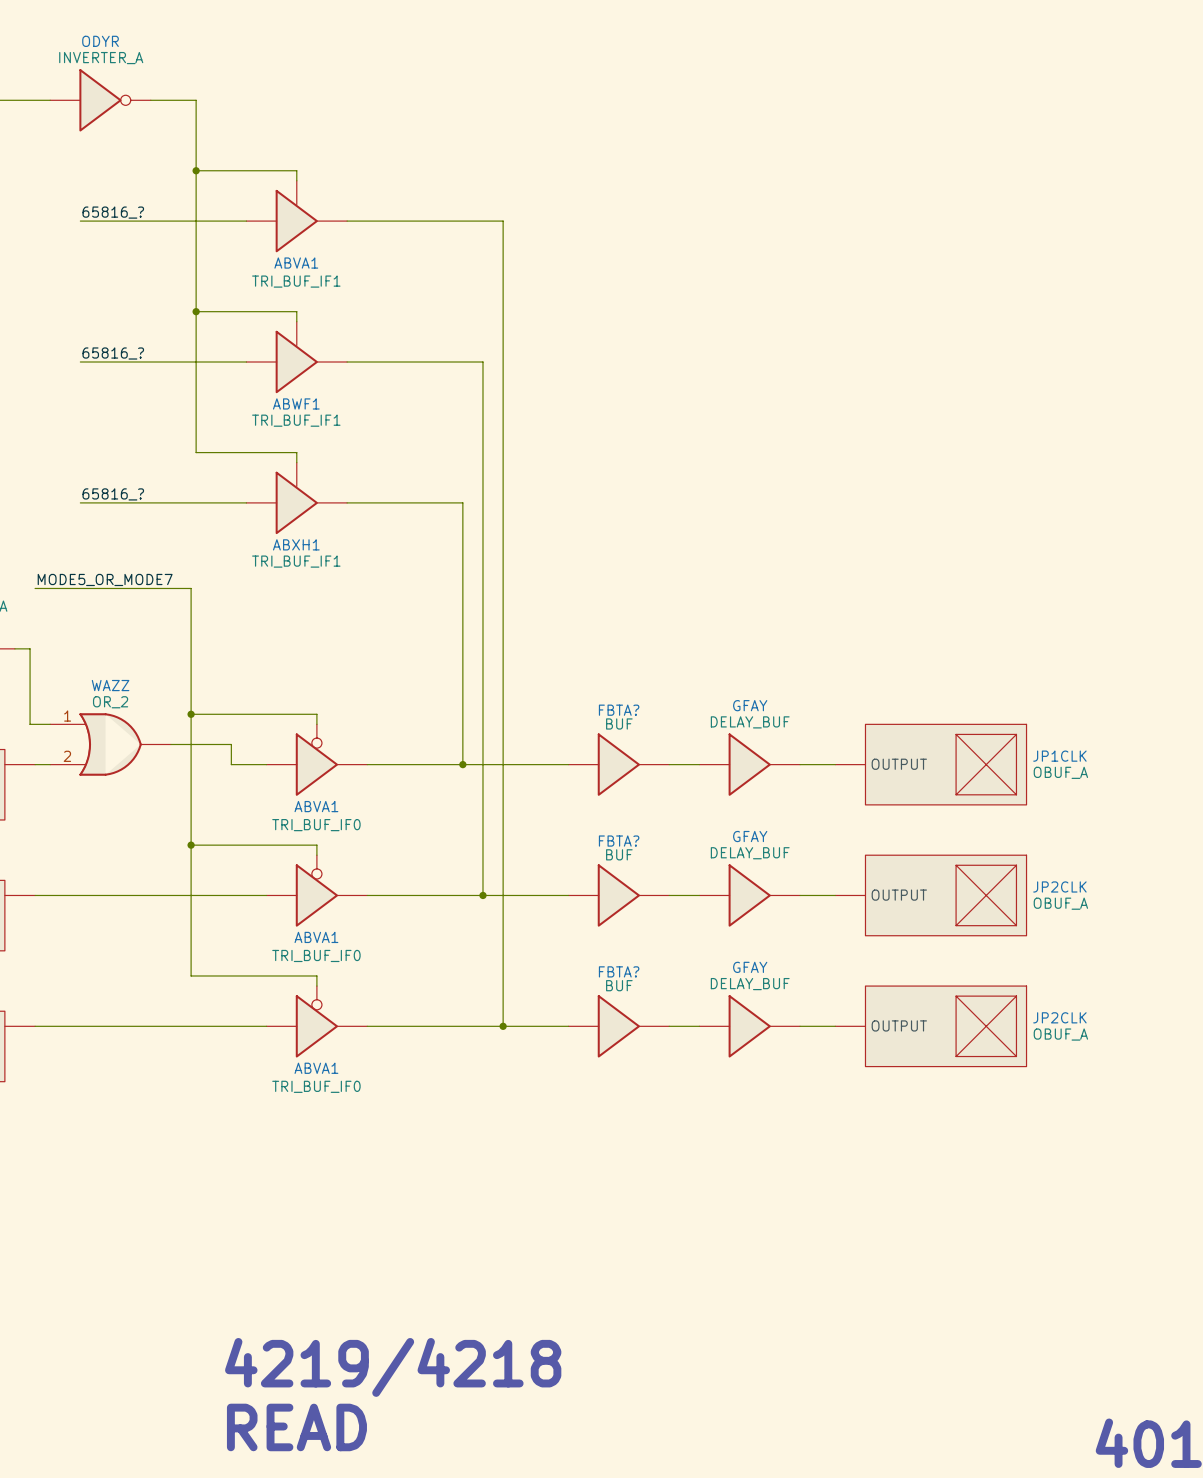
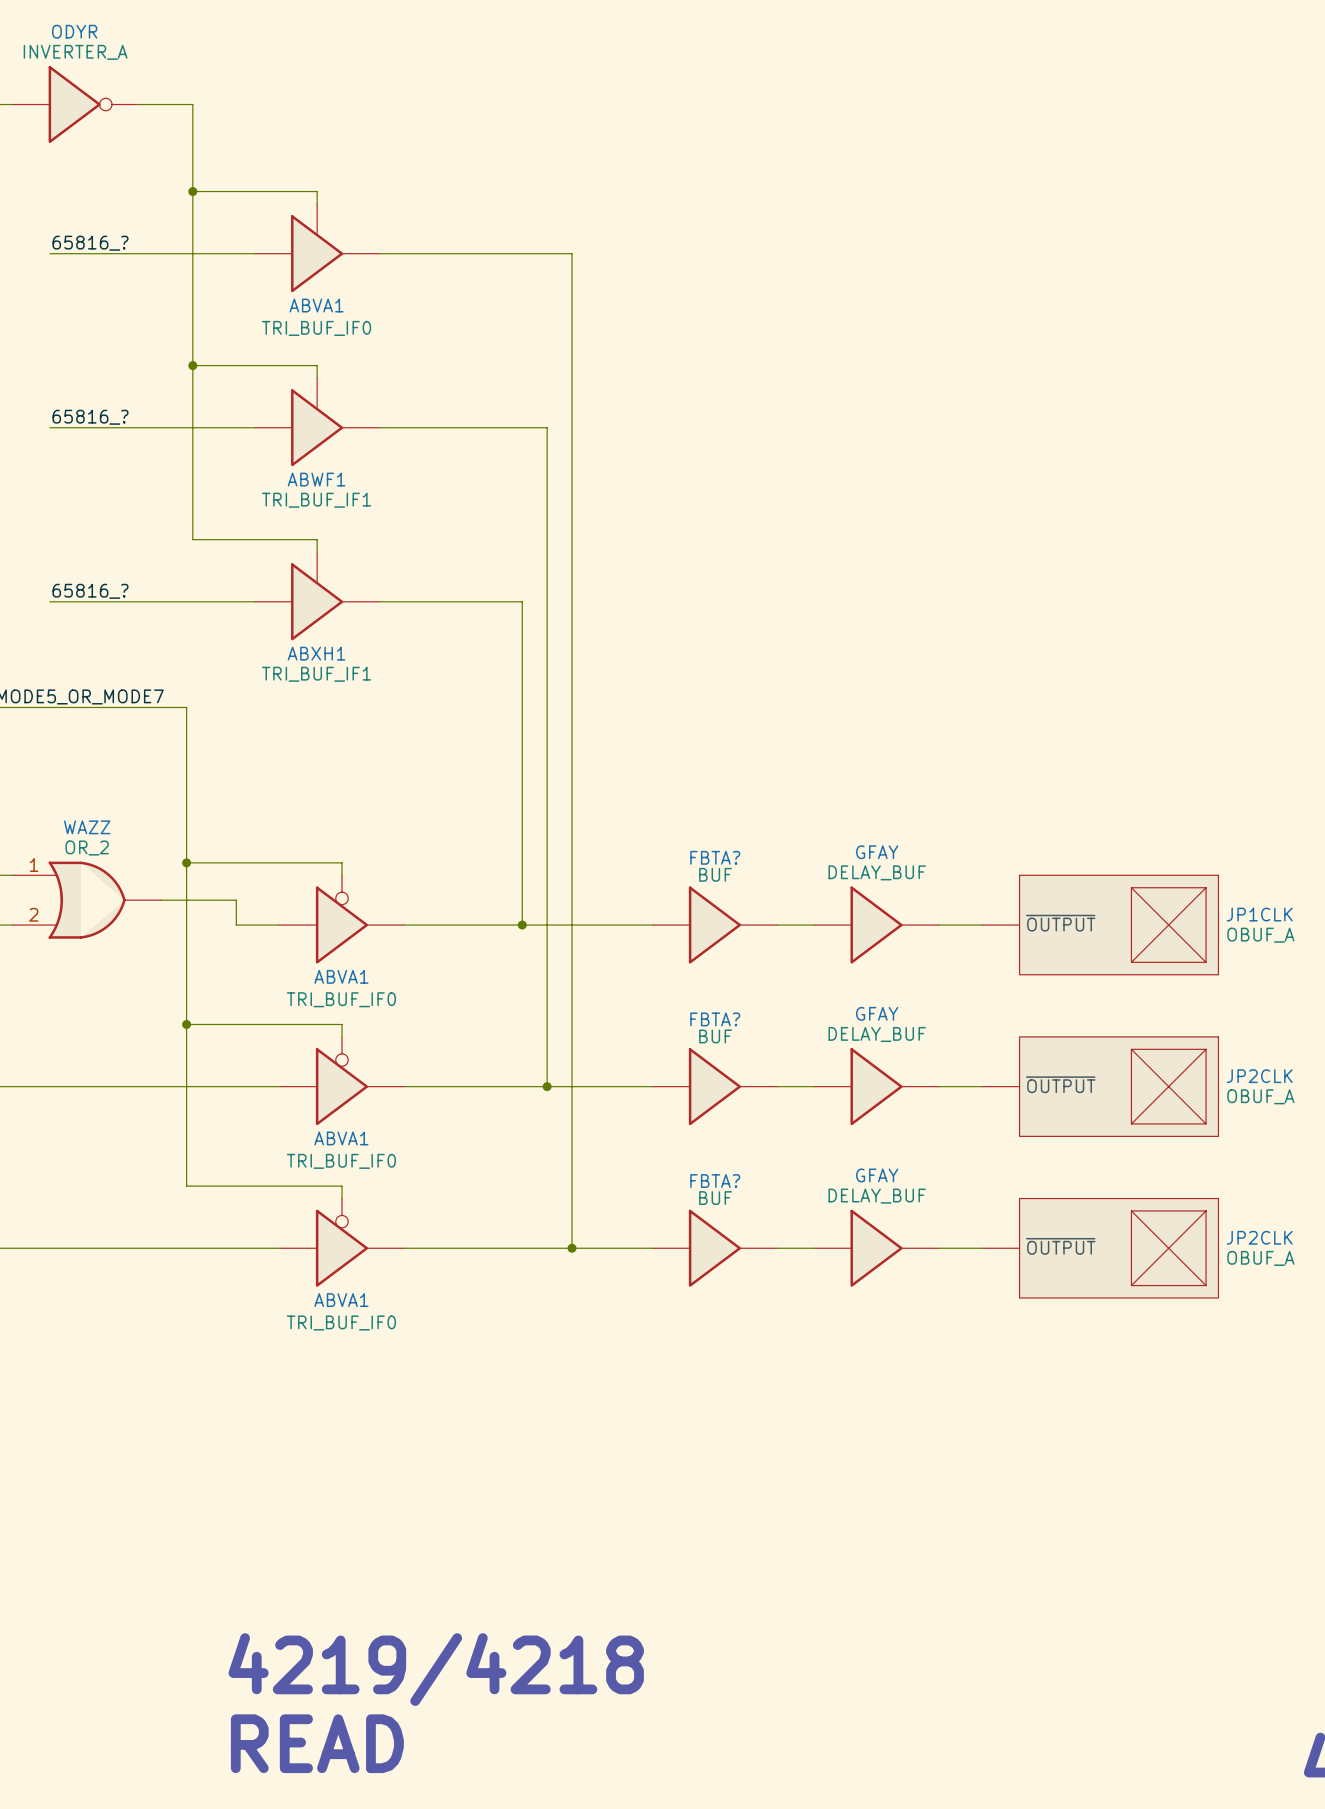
ABVA1 value: TRI_BUF_IF1 (296, 281) -> TRI_BUF_IF0 (316, 328)
JP1CLK pin name: OUTPUT (899, 764) -> ~{OUTPUT} (1060, 923)
JP2CLK pin name: OUTPUT (899, 895) -> ~{OUTPUT} (1060, 1084)
JP2CLK pin name: OUTPUT (899, 1025) -> ~{OUTPUT} (1060, 1246)

